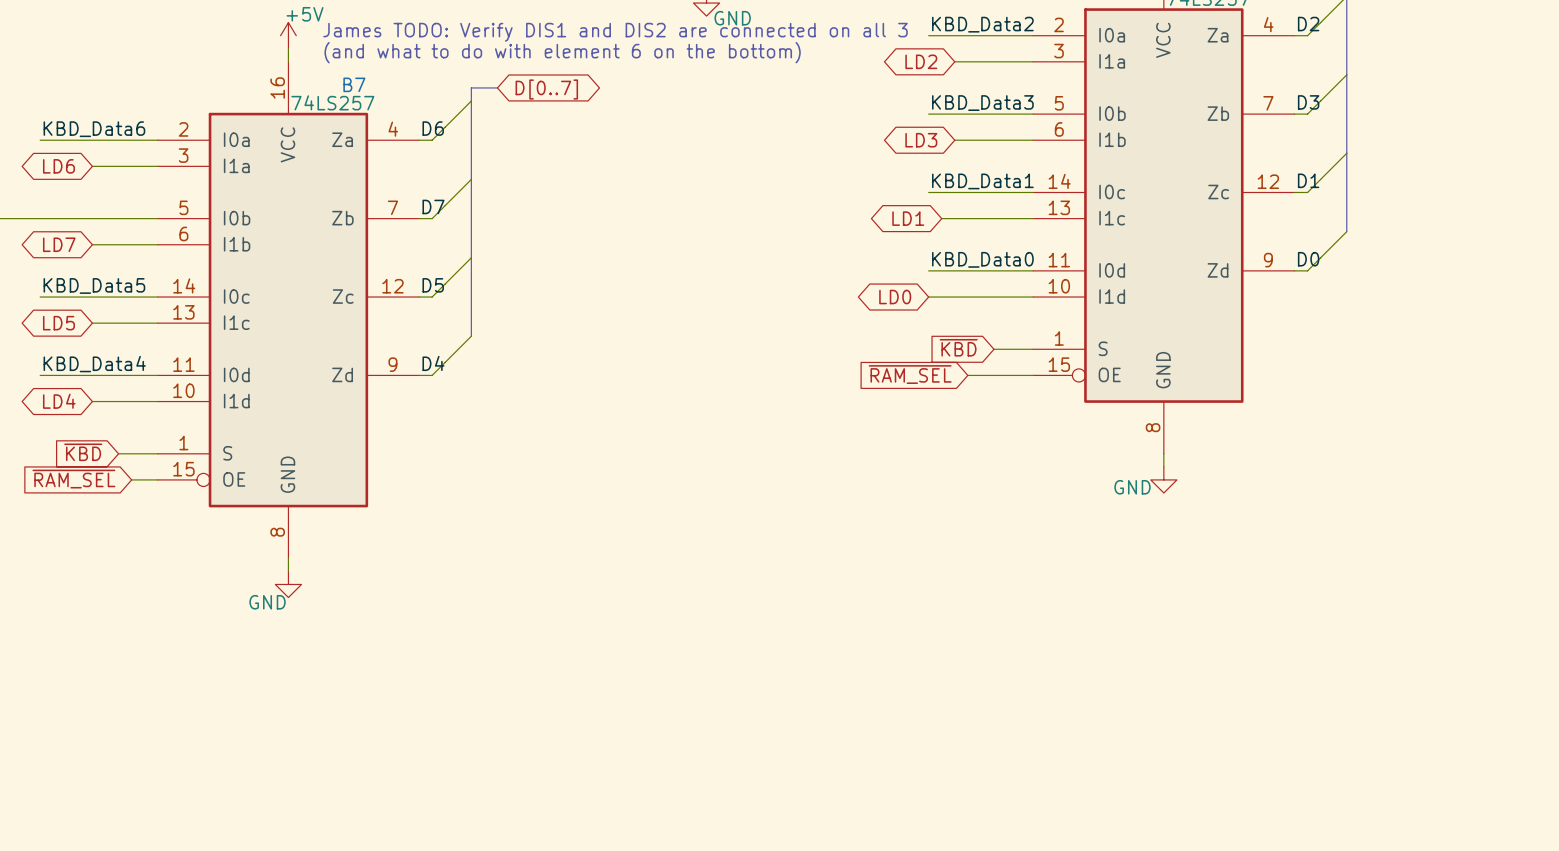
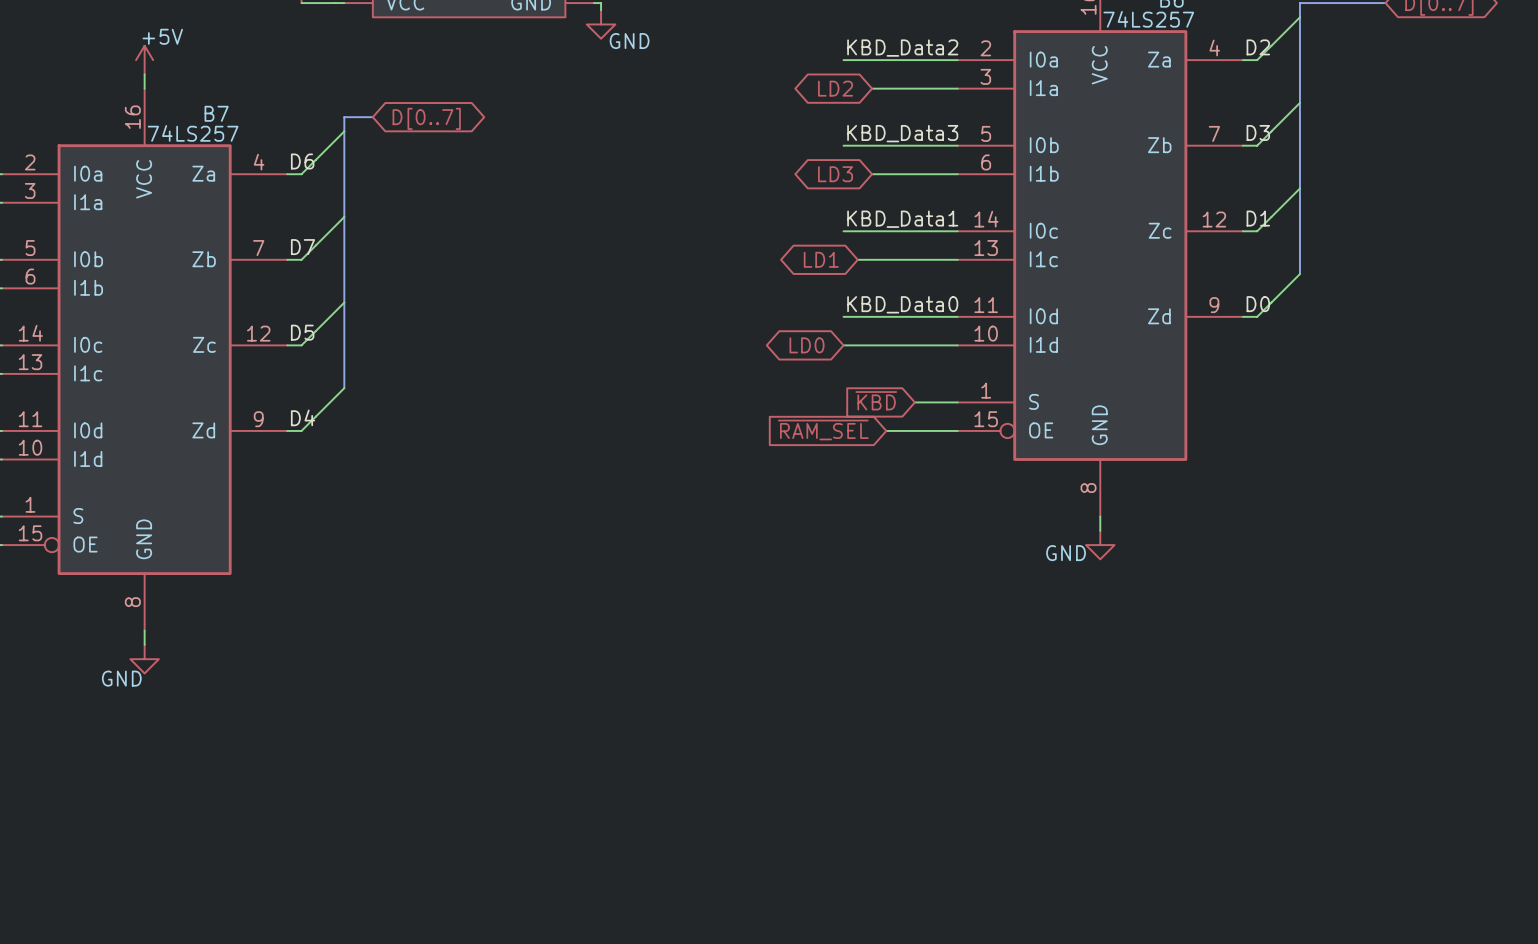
text: James TODO: Verify DIS1 and DIS2 are connected on all 3 (615, 32) -> none
text: (and what to do with element 6 on the bottom) (562, 52) -> none

